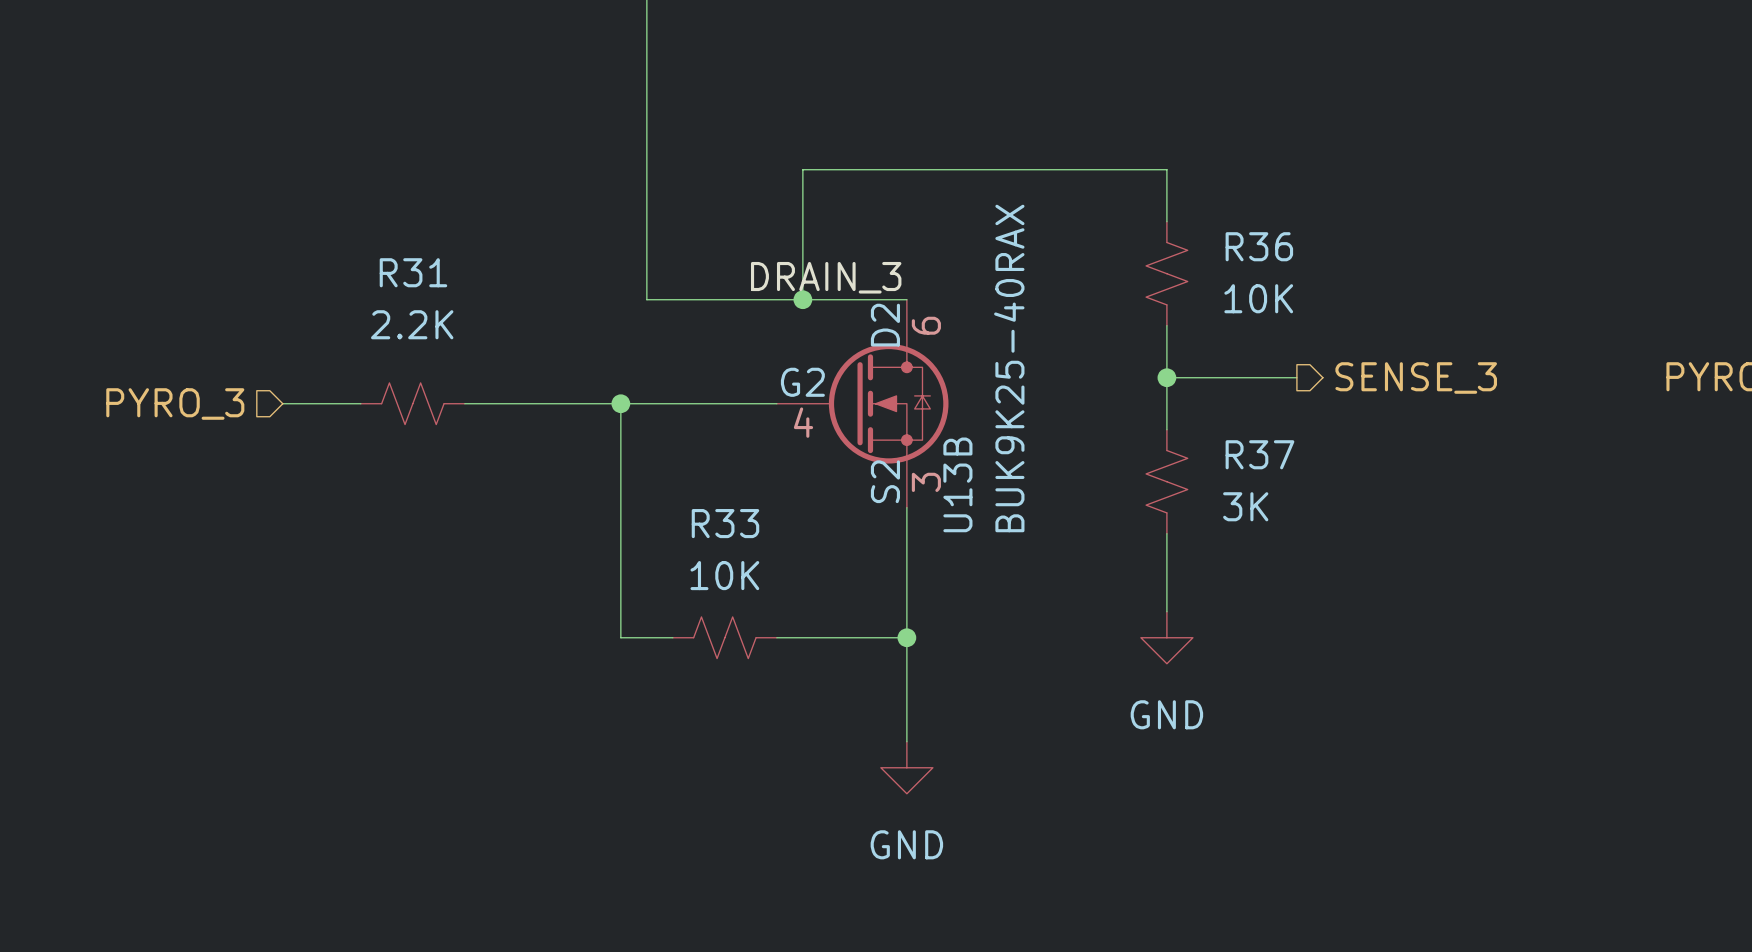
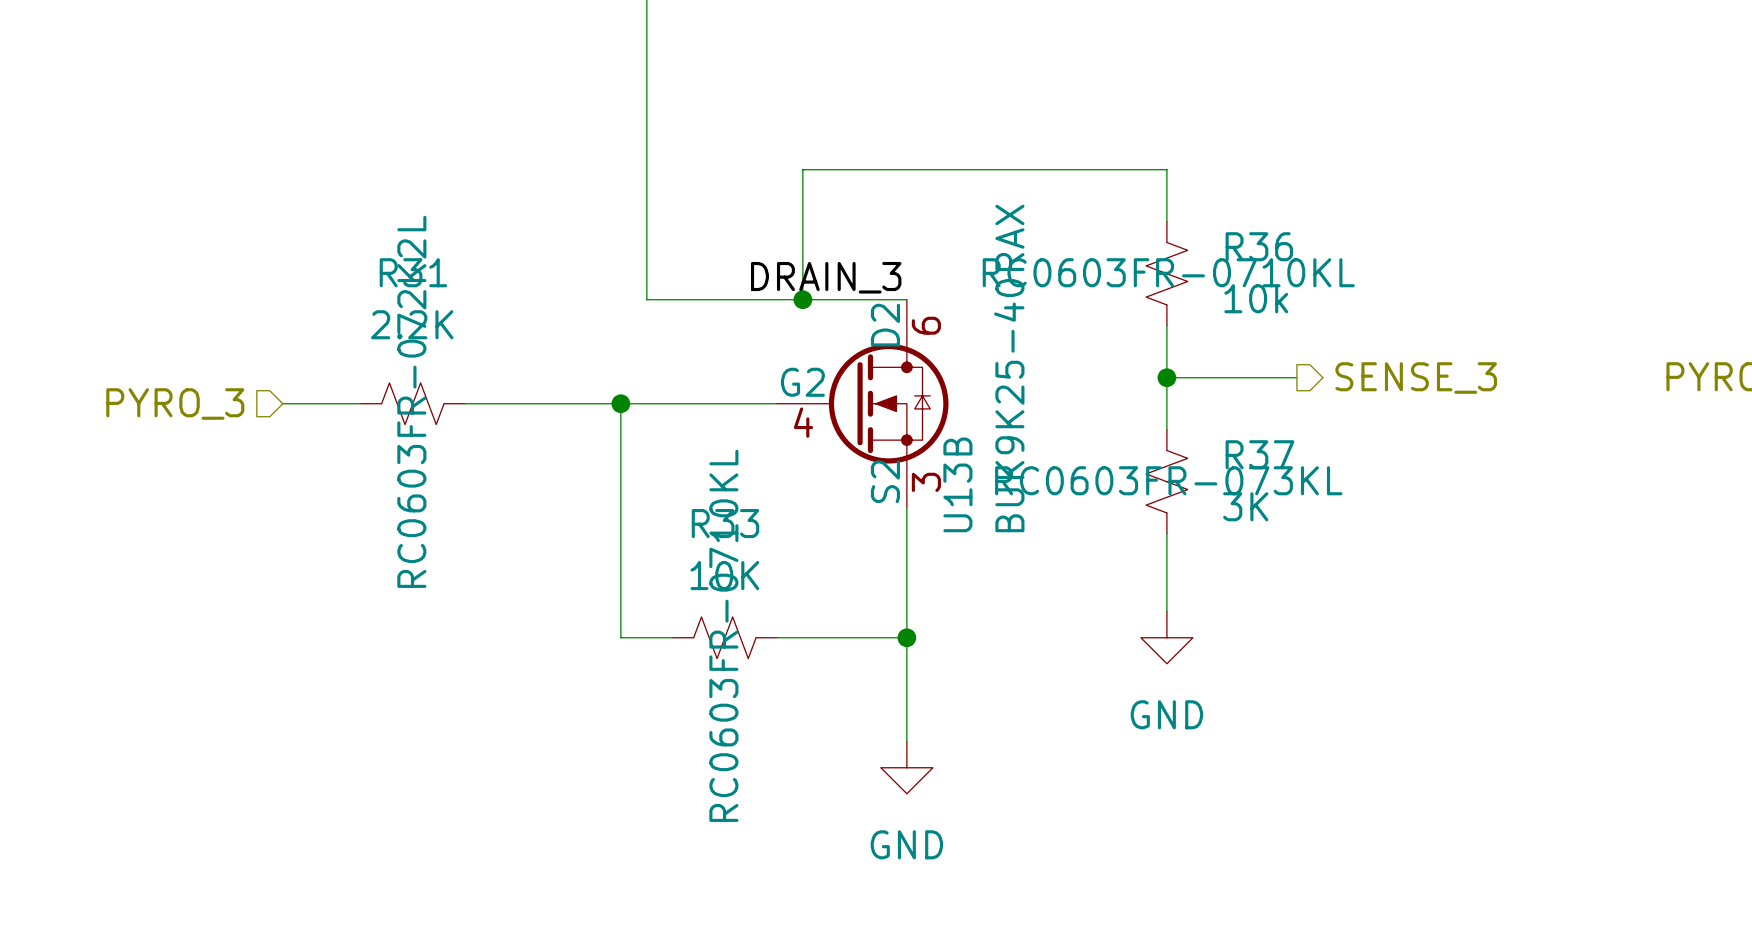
R36 text: none -> RC0603FR-0710KL (1168, 272)
R36 value: 10K (1258, 298) -> 10k (1256, 298)
R31 text: none -> RC0603FR-072K2L (411, 401)
R37 text: none -> RC0603FR-073KL (1168, 480)
R33 text: none -> RC0603FR-0710KL (723, 635)

